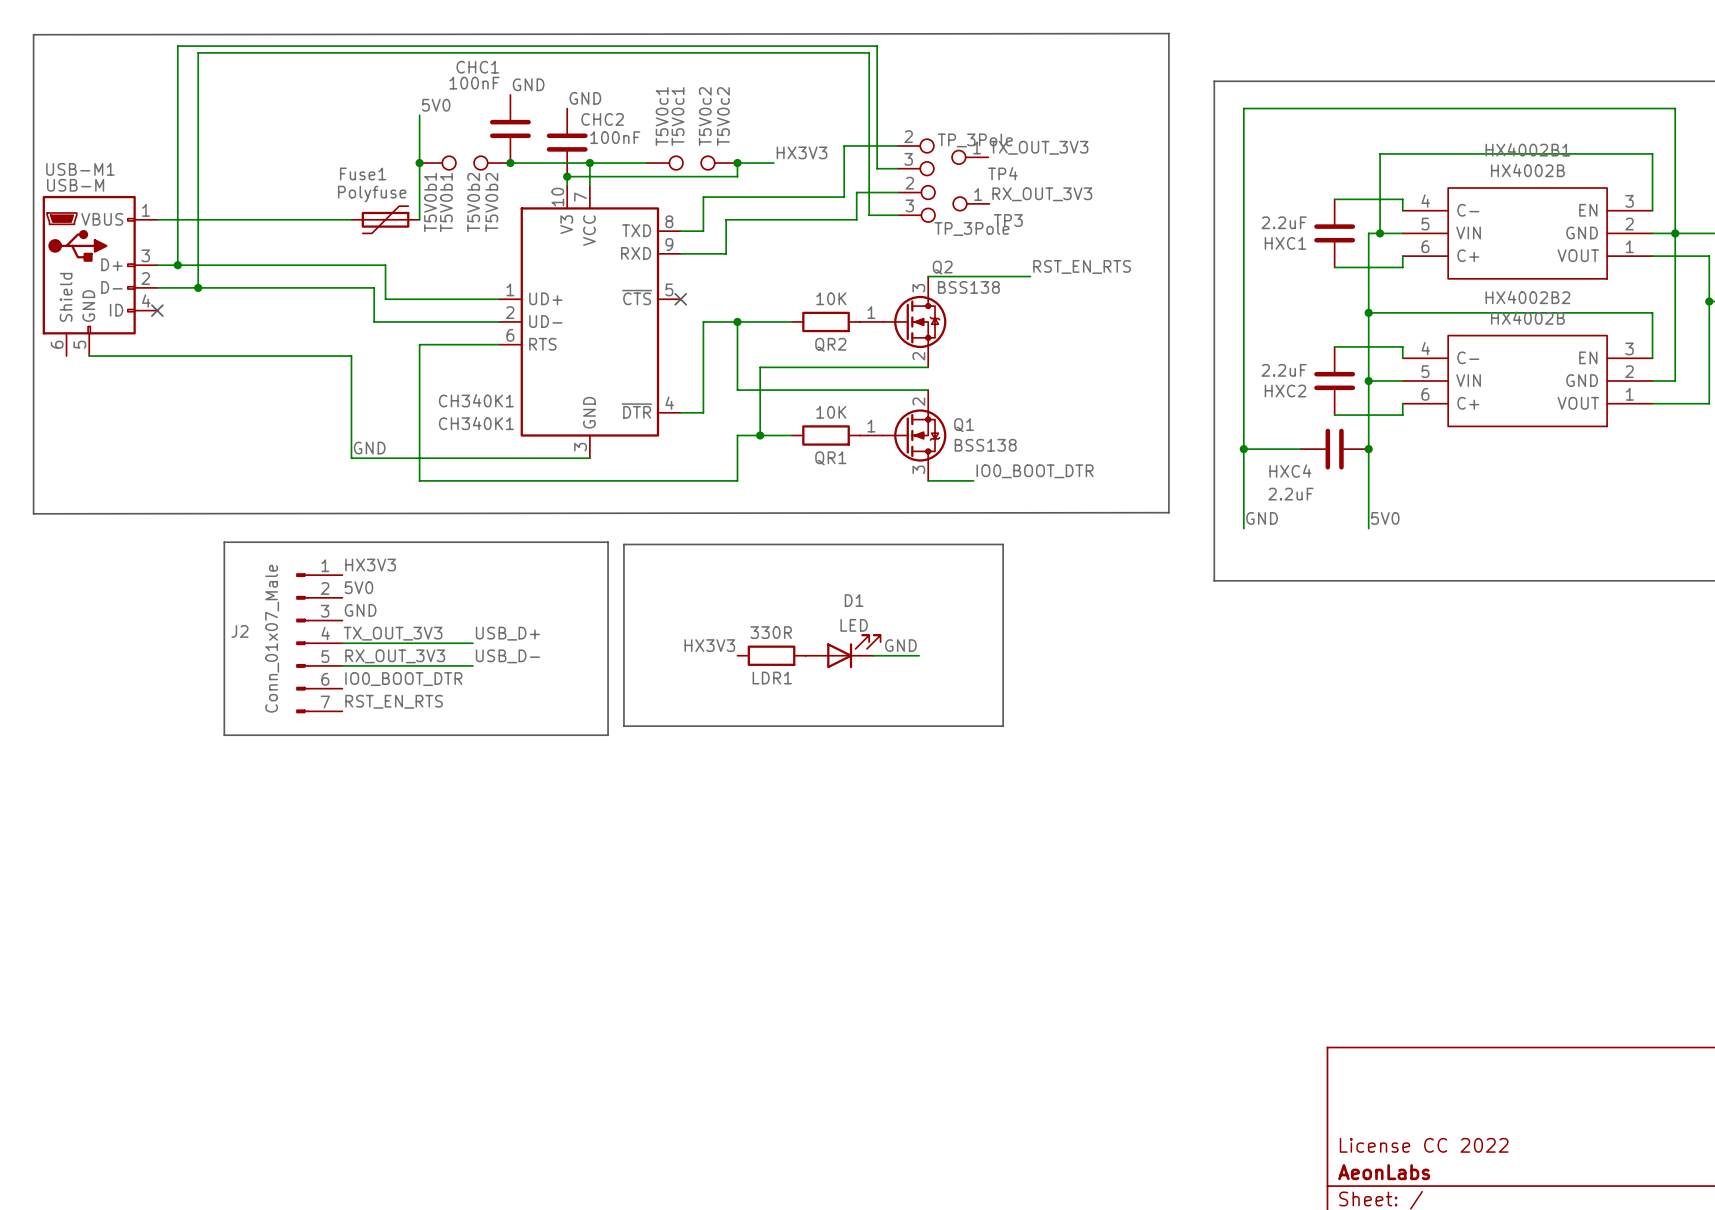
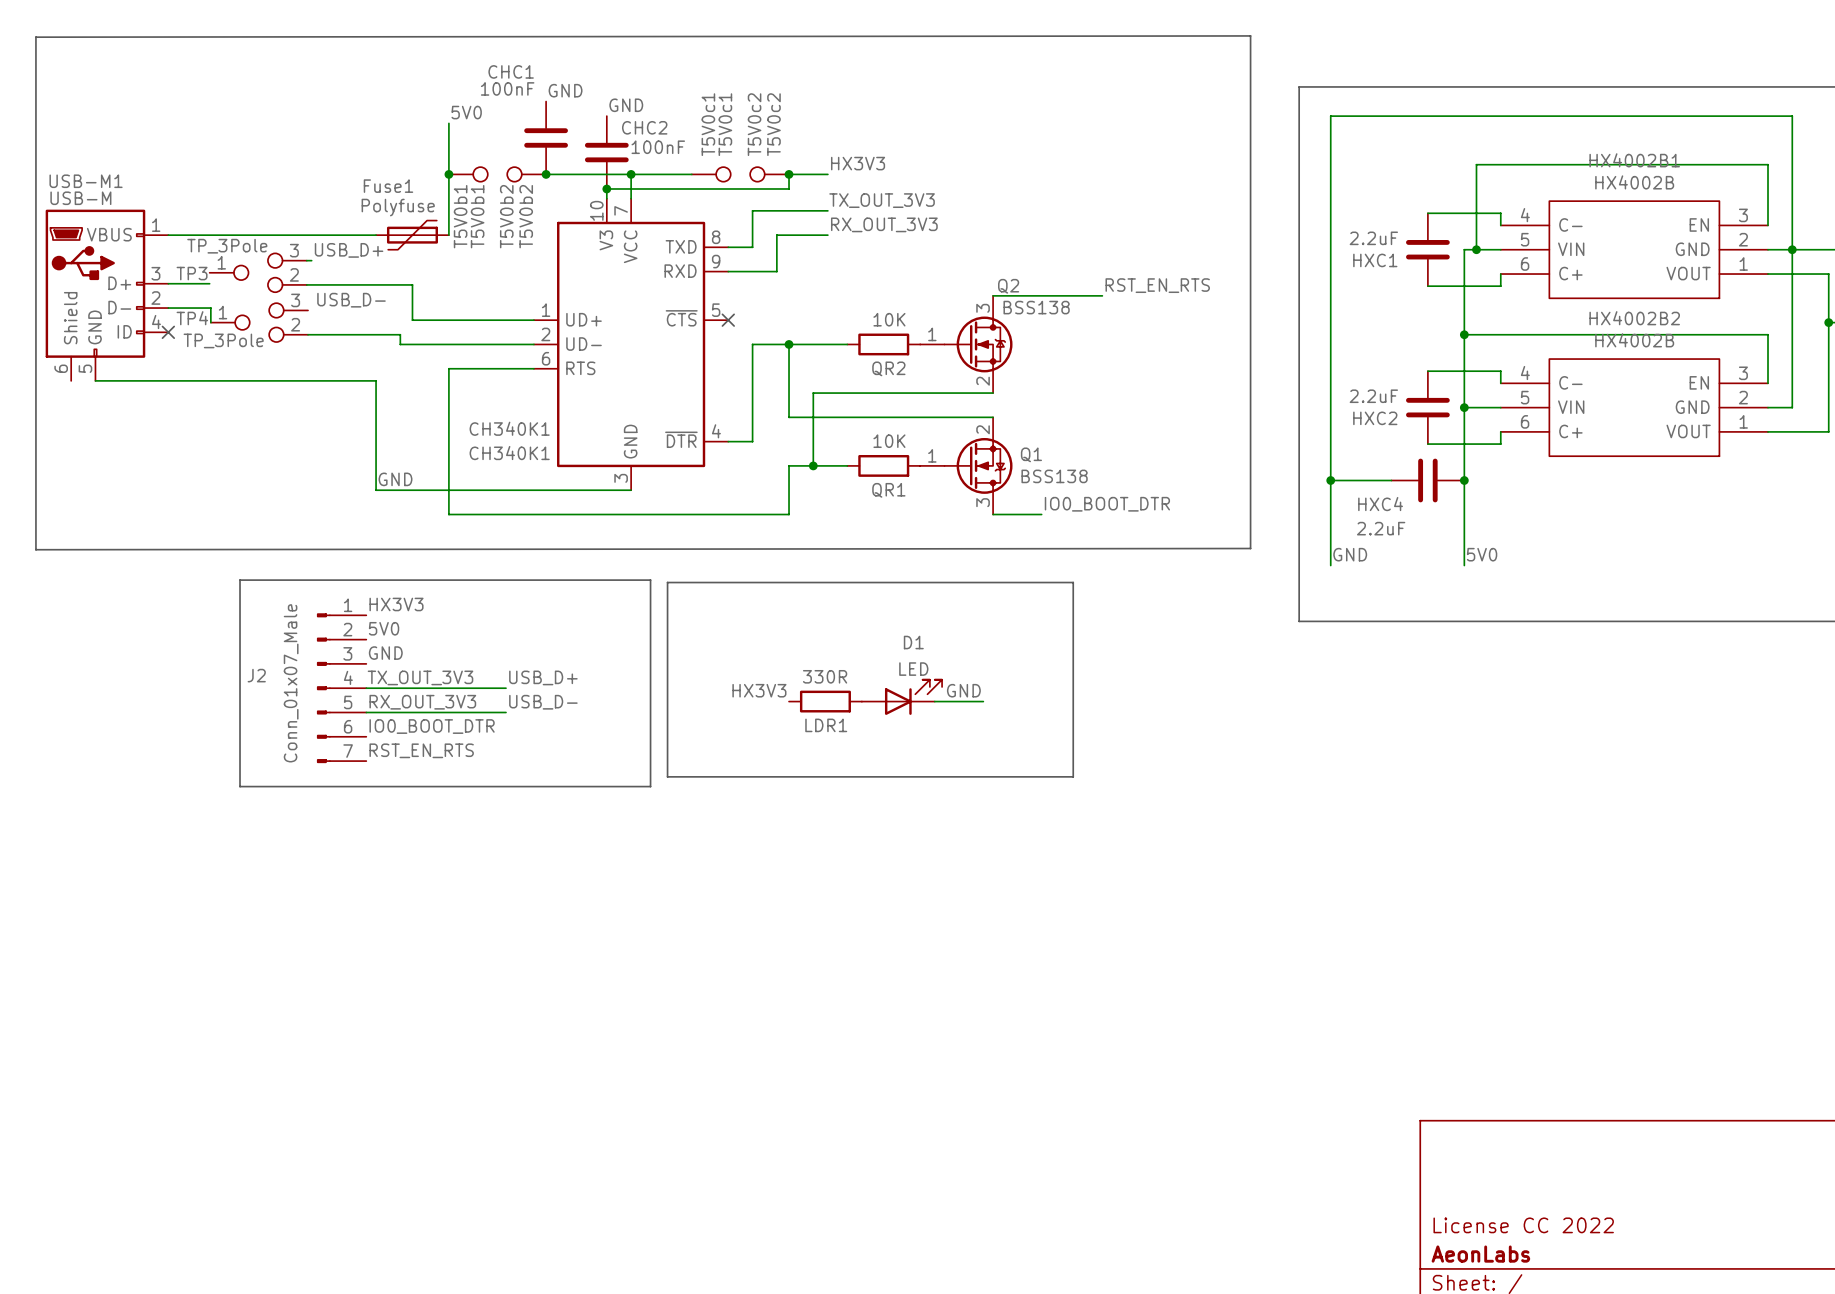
wire: (897, 145) (844, 145) (844, 197) (773, 197) -> none
label position: TX_OUT_3V3 (1039, 147) -> TX_OUT_3V3 (882, 200)
TP4 rotation: 0° (942, 157) -> 180° (259, 322)
TP4 position: (942, 157) -> (259, 322)
wire: (897, 168) (877, 168) (877, 46) (177, 46) (177, 265) -> none
wire: (898, 192) (856, 192) (856, 219) (773, 219) -> none
label position: RX_OUT_3V3 (1042, 194) -> RX_OUT_3V3 (884, 224)
TP3 rotation: 0° (944, 203) -> 180° (258, 272)
TP3 position: (944, 203) -> (258, 272)
wire: (898, 215) (869, 215) (869, 52) (198, 52) (198, 287) -> none
TP3 name position: TP3 (1008, 220) -> TP3 (192, 273)
label: none -> USB_D+ (349, 250)
wire: none -> (306, 260) (311, 260)
junction: (177, 265) -> none
wire: (195, 265) (385, 266) -> (306, 284) (412, 284)
label: none -> USB_D- (351, 300)
wire: (197, 287) (374, 287) (374, 312) -> (308, 334) (400, 334)
wire: none -> (210, 308) (210, 322)
junction: (198, 287) -> none

